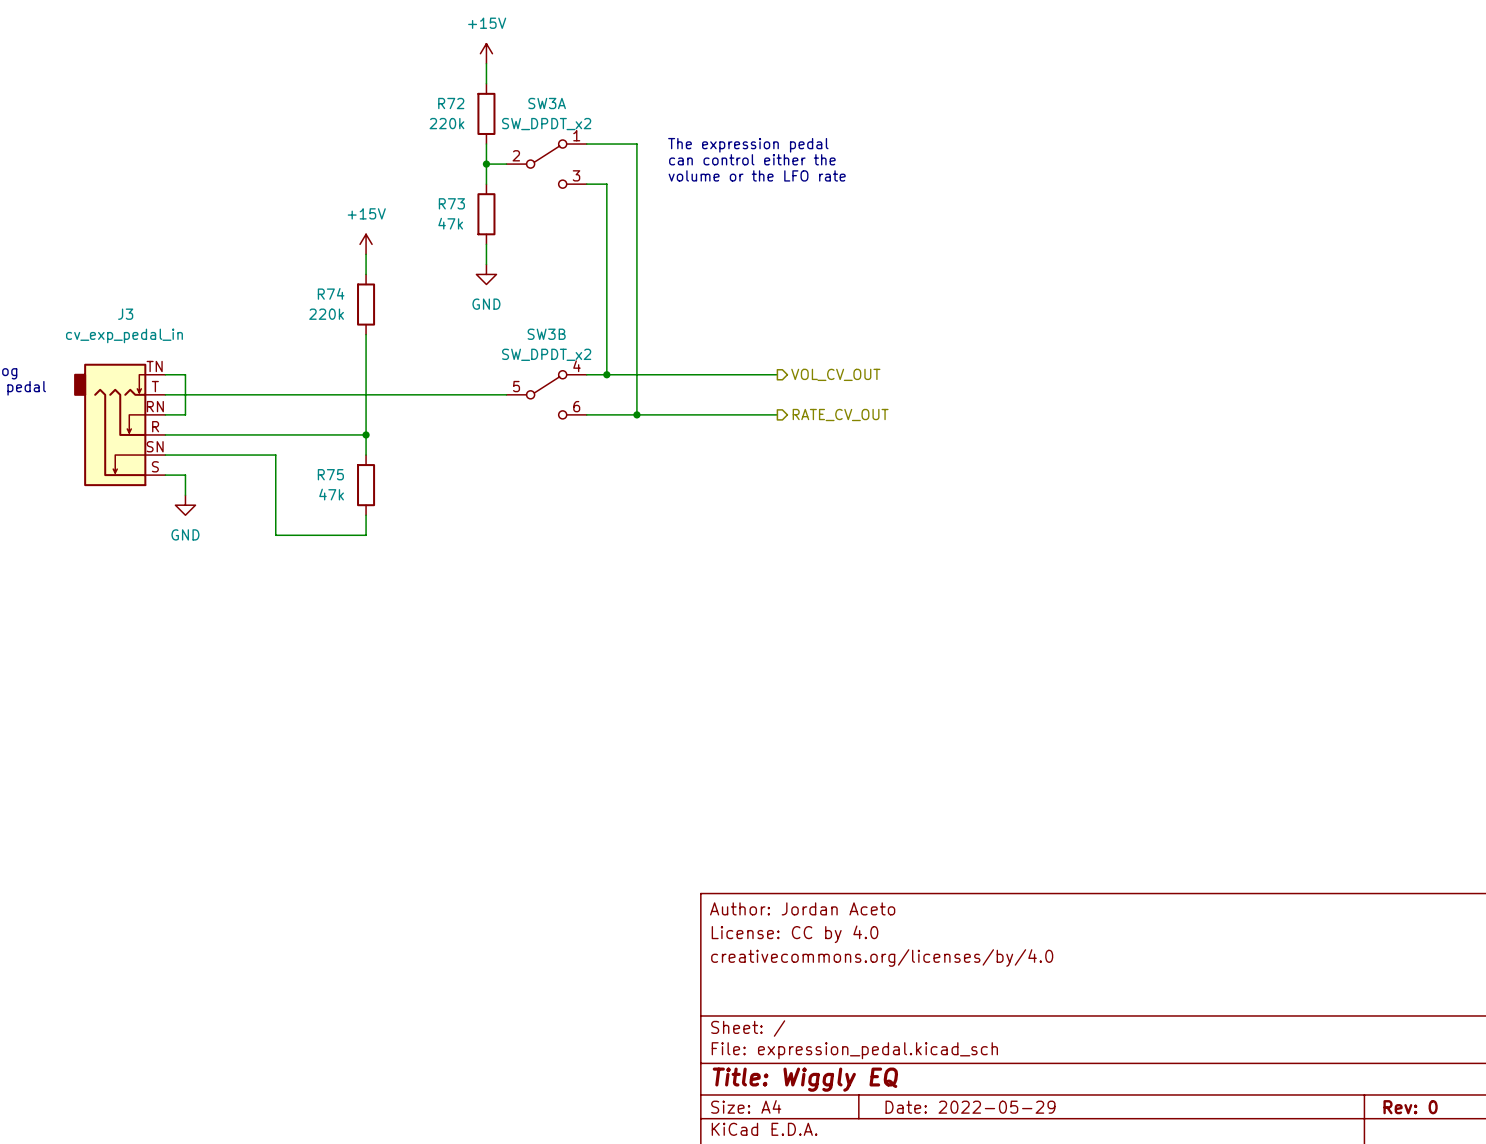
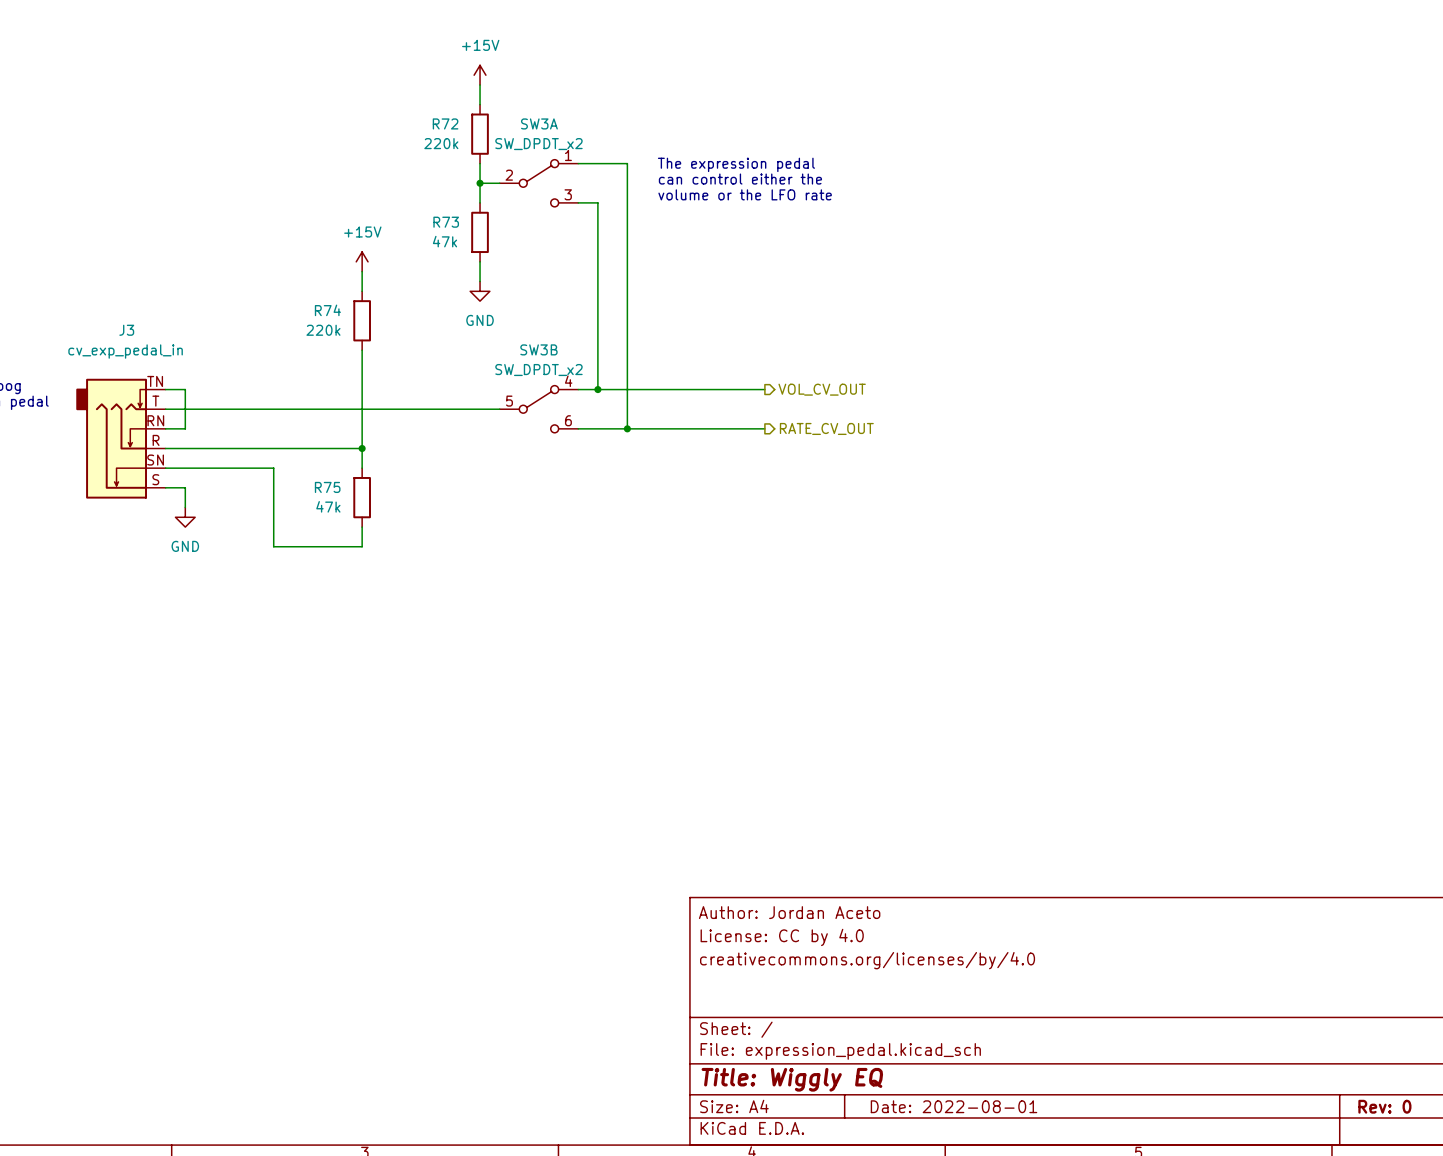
title block: Date: 2022-05-29 (970, 1107) -> Date: 2022-08-01 (954, 1106)

